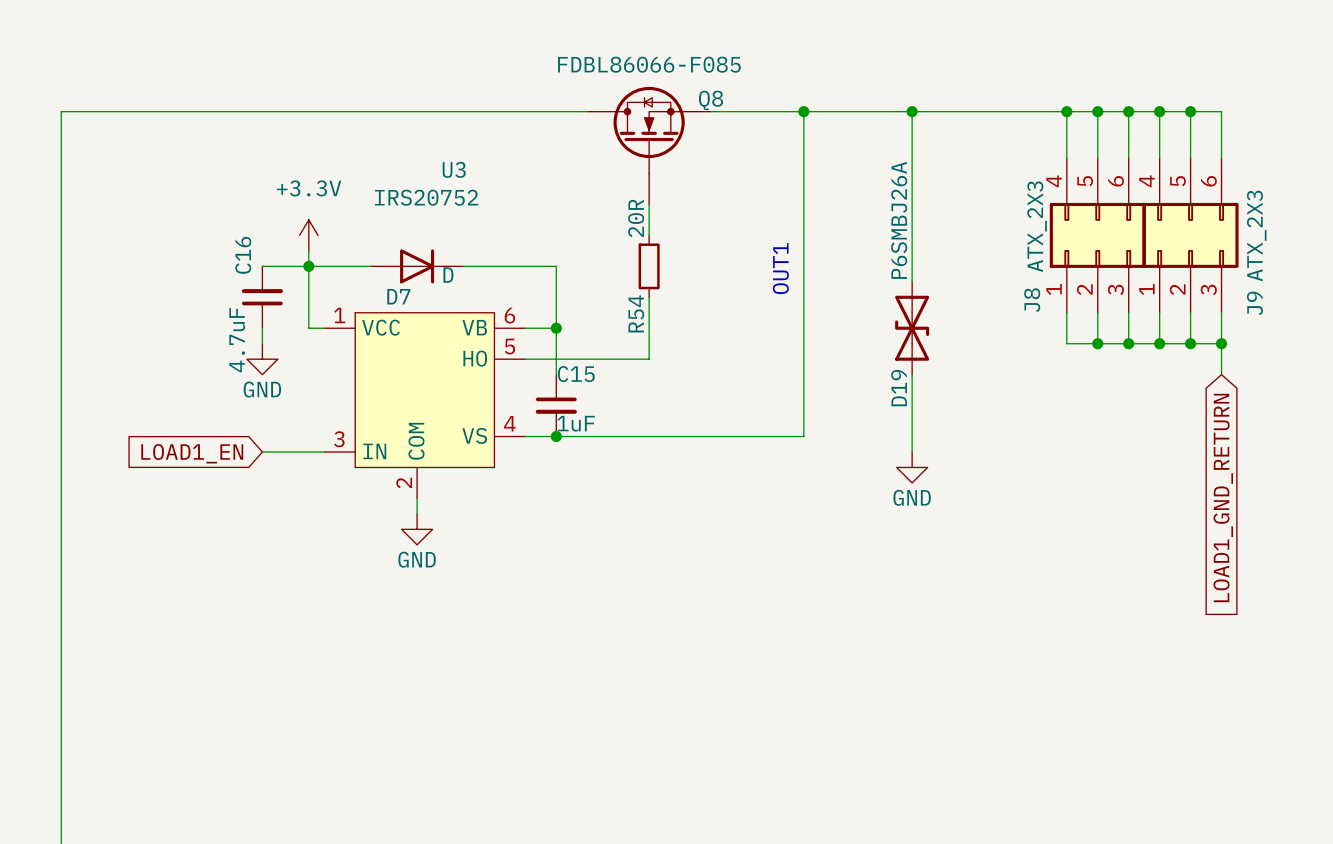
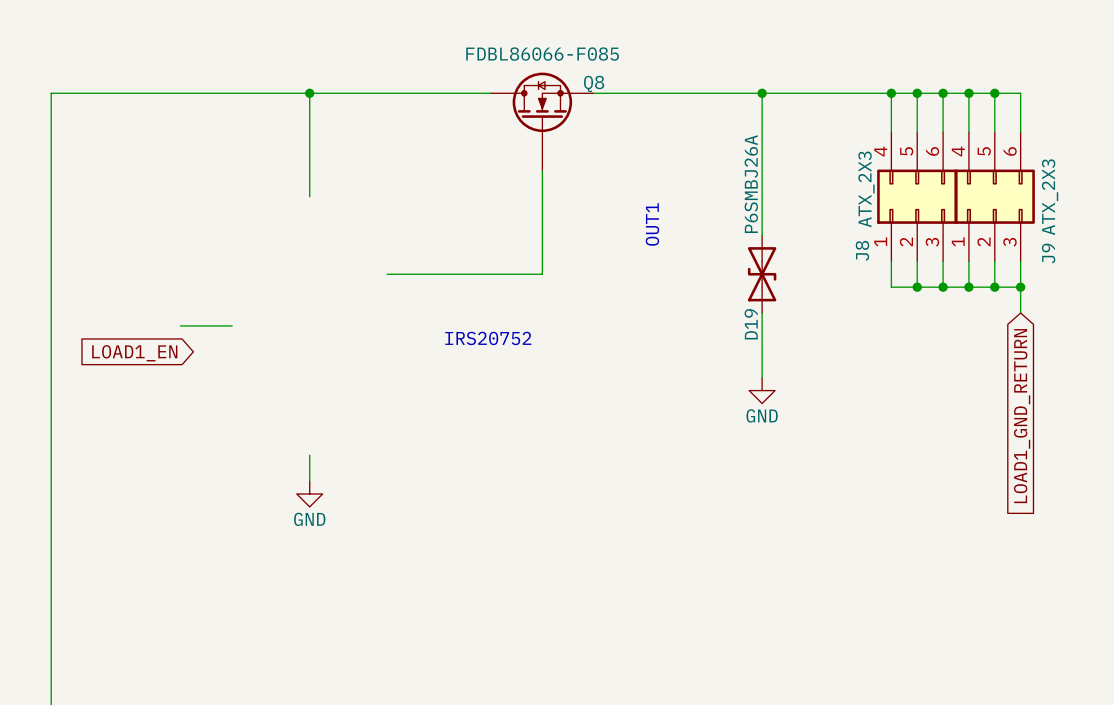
wire: none -> (309, 93) (309, 196)
junction: none -> (309, 93)
wire: (803, 111) (803, 436) (525, 436) -> none
junction: (803, 111) -> none
power symbol: +3.3V (308, 235) -> none
wire: none -> (542, 196) (542, 248)
wire: (308, 250) (308, 328) (324, 328) -> none
wire: (262, 266) (370, 266) -> none
junction: (308, 266) -> none
D7: D (417, 266) -> none
wire: (463, 266) (556, 266) (556, 374) -> none
R54: 20R (649, 266) -> none
C16: 4.7uF (262, 297) -> none
wire: (262, 328) (262, 343) -> none
junction: (556, 328) -> none
wire: (649, 328) (649, 359) (525, 359) -> (542, 274) (464, 274)
power symbol: GND (262, 359) -> none
U3: IRS20752 (424, 405) -> none
C15: 1uF (556, 405) -> none
text: none -> IRS20752 (488, 338)
junction: (556, 436) -> none
wire: (262, 452) (324, 452) -> (180, 325) (232, 325)
global label position: LOAD1_EN (192, 453) -> LOAD1_EN (134, 353)
wire: (417, 498) (417, 513) -> none
power symbol position: GND (417, 529) -> GND (309, 493)
wire: none -> (309, 455) (309, 481)

